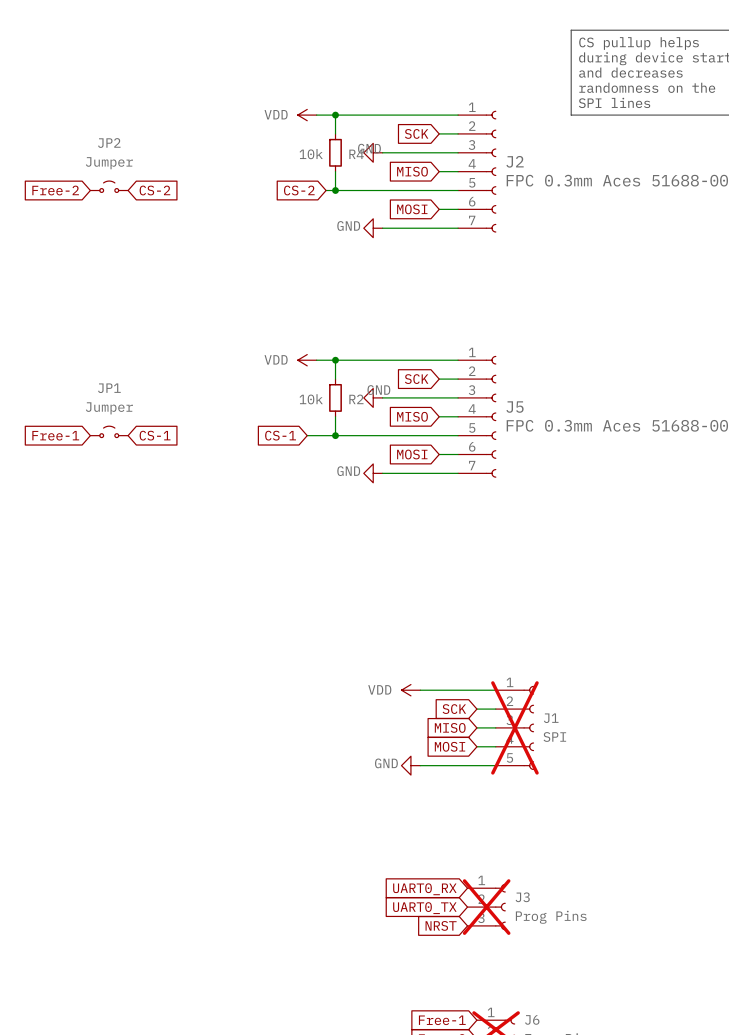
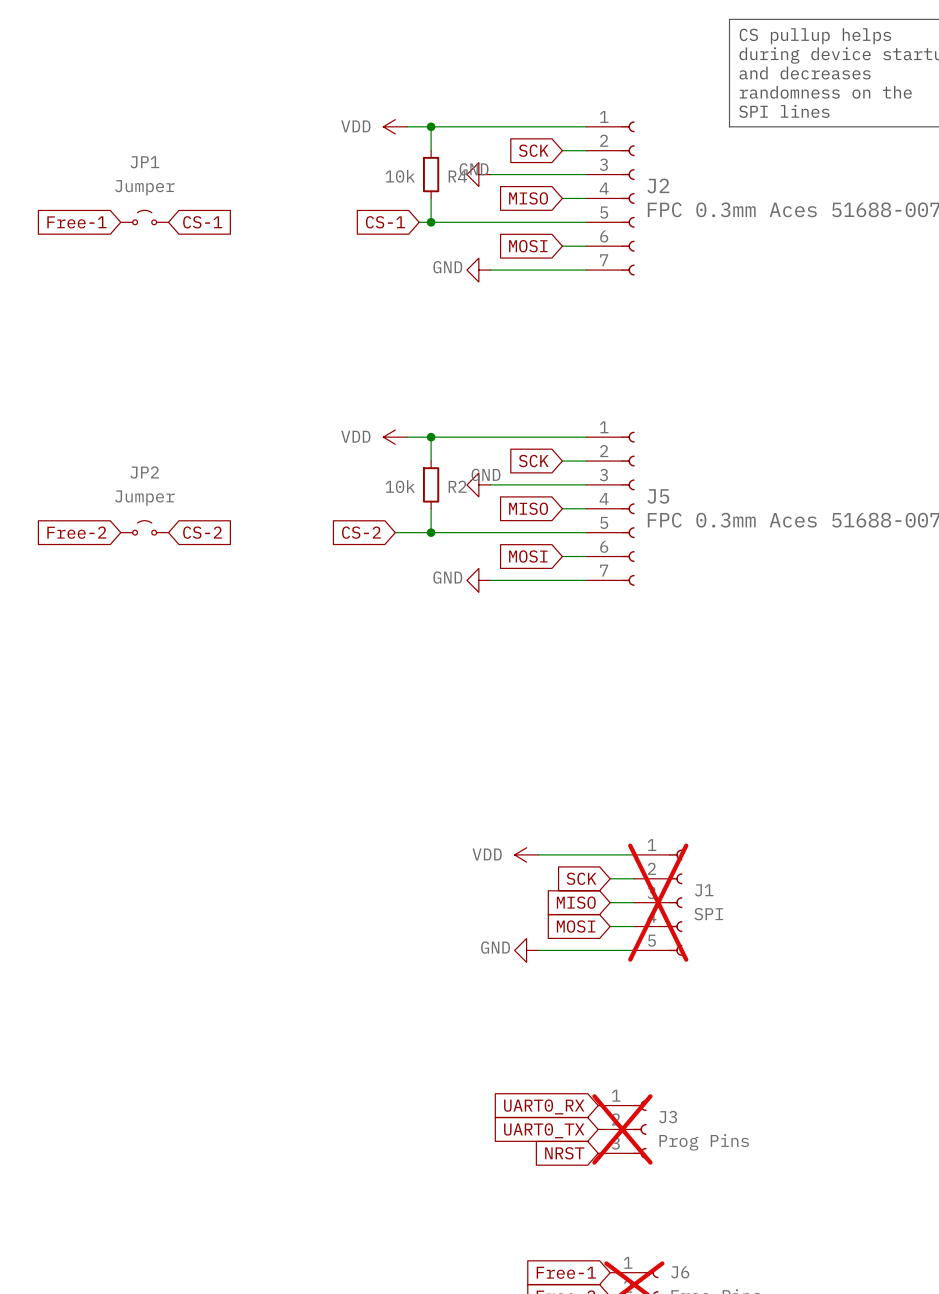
JP2 name: JP2 (109, 143) -> JP1 (144, 162)
global label: Free-2 (55, 190) -> Free-1 (76, 222)
global label: CS-2 (154, 190) -> CS-1 (202, 222)
global label: CS-2 (299, 190) -> CS-1 (385, 222)
JP1 name: JP1 (109, 388) -> JP2 (144, 472)
global label: Free-1 (55, 435) -> Free-2 (76, 532)
global label: CS-1 (155, 435) -> CS-2 (202, 532)
global label: CS-1 (280, 435) -> CS-2 (361, 532)

